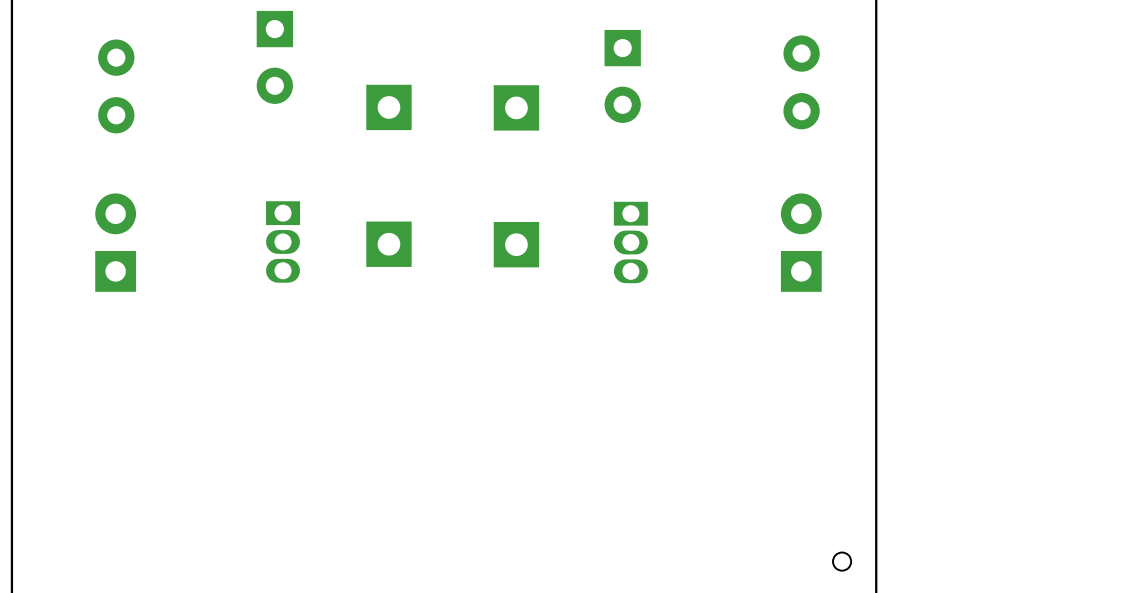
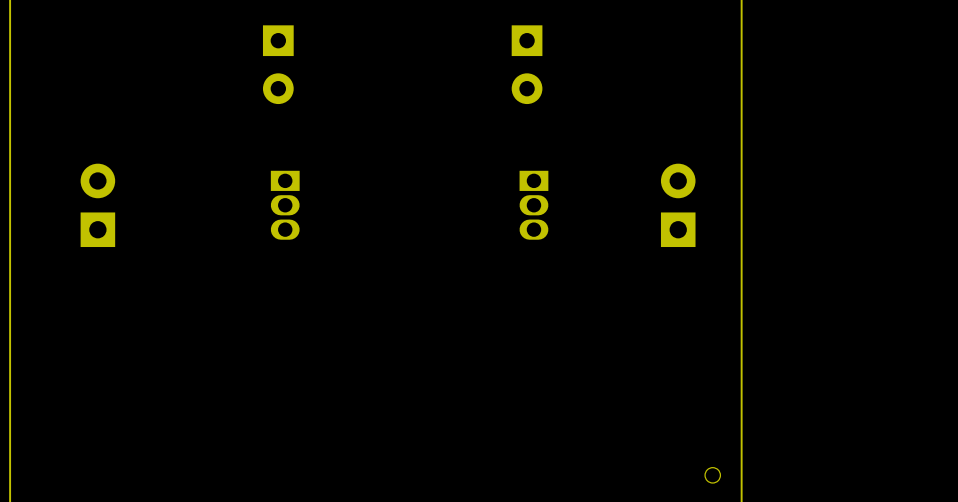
part position: (274, 57) -> (278, 64)
part: (801, 82) -> none
part: (116, 86) -> none
part: (388, 107) -> none
part: (516, 107) -> none
part position: (283, 241) -> (285, 205)
part: (388, 244) -> none
part: (516, 244) -> none

